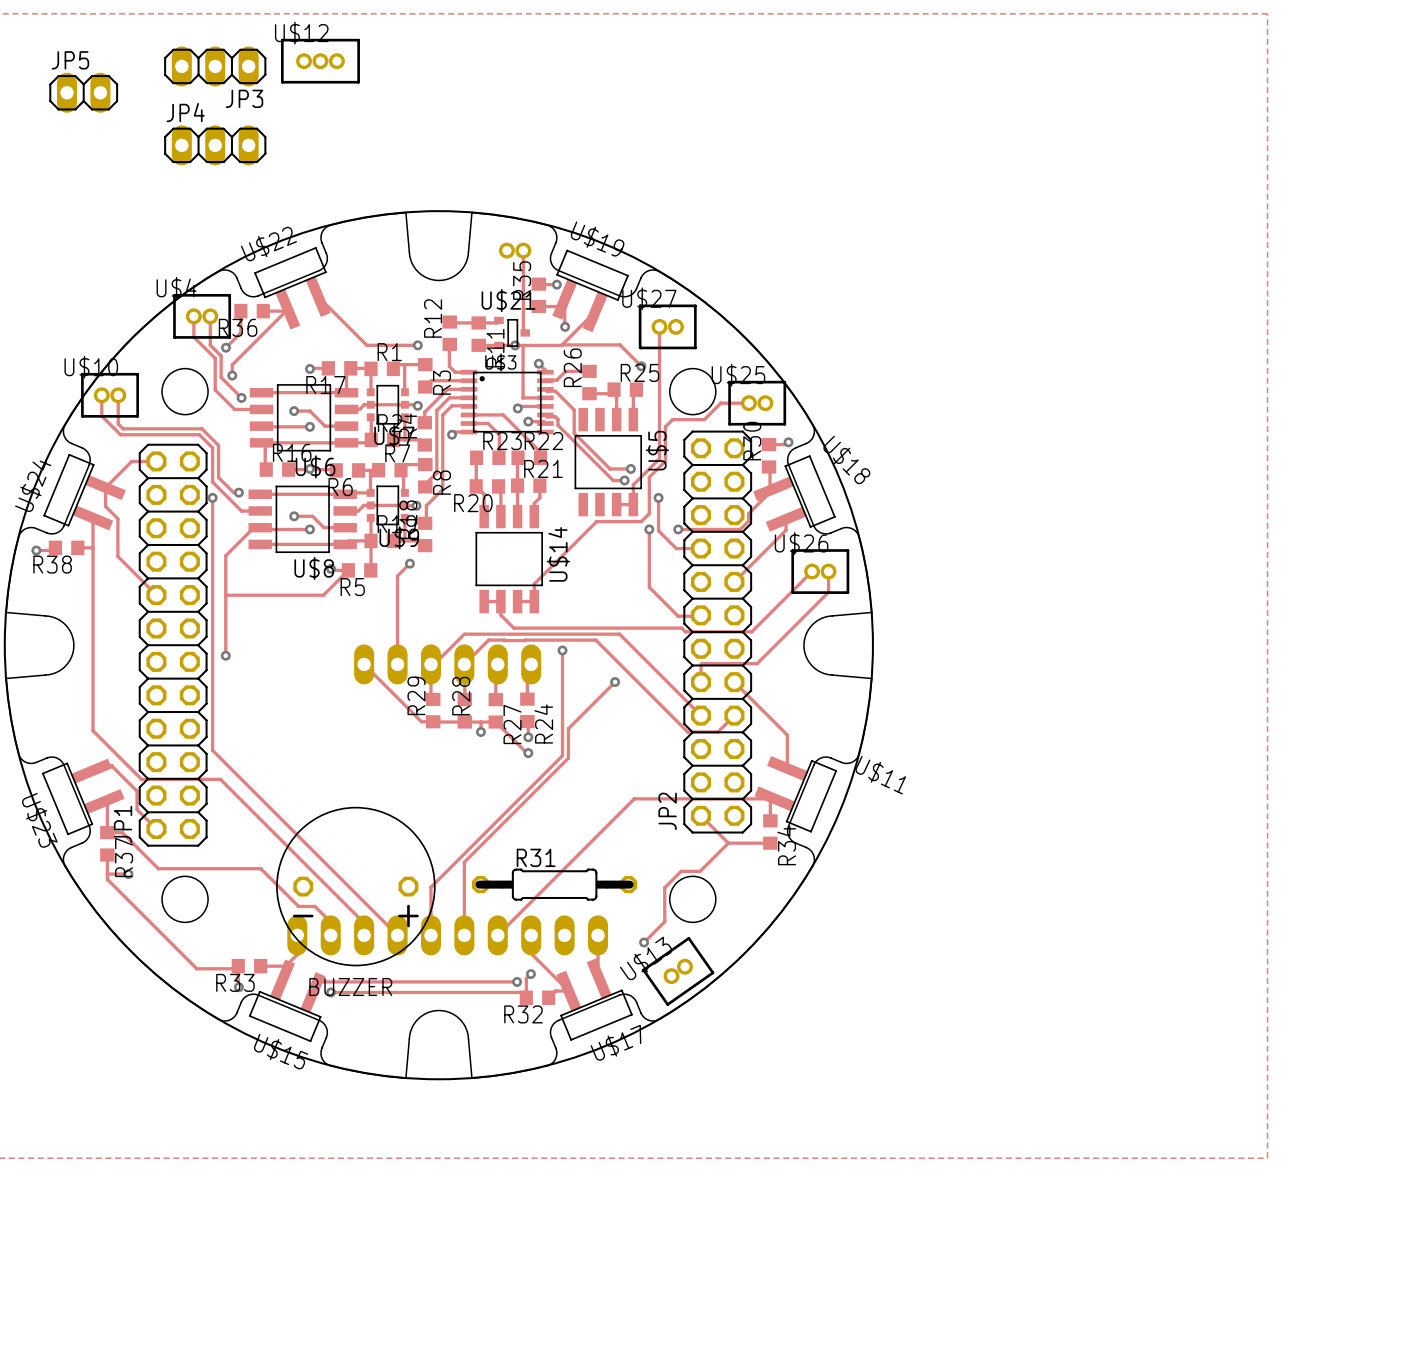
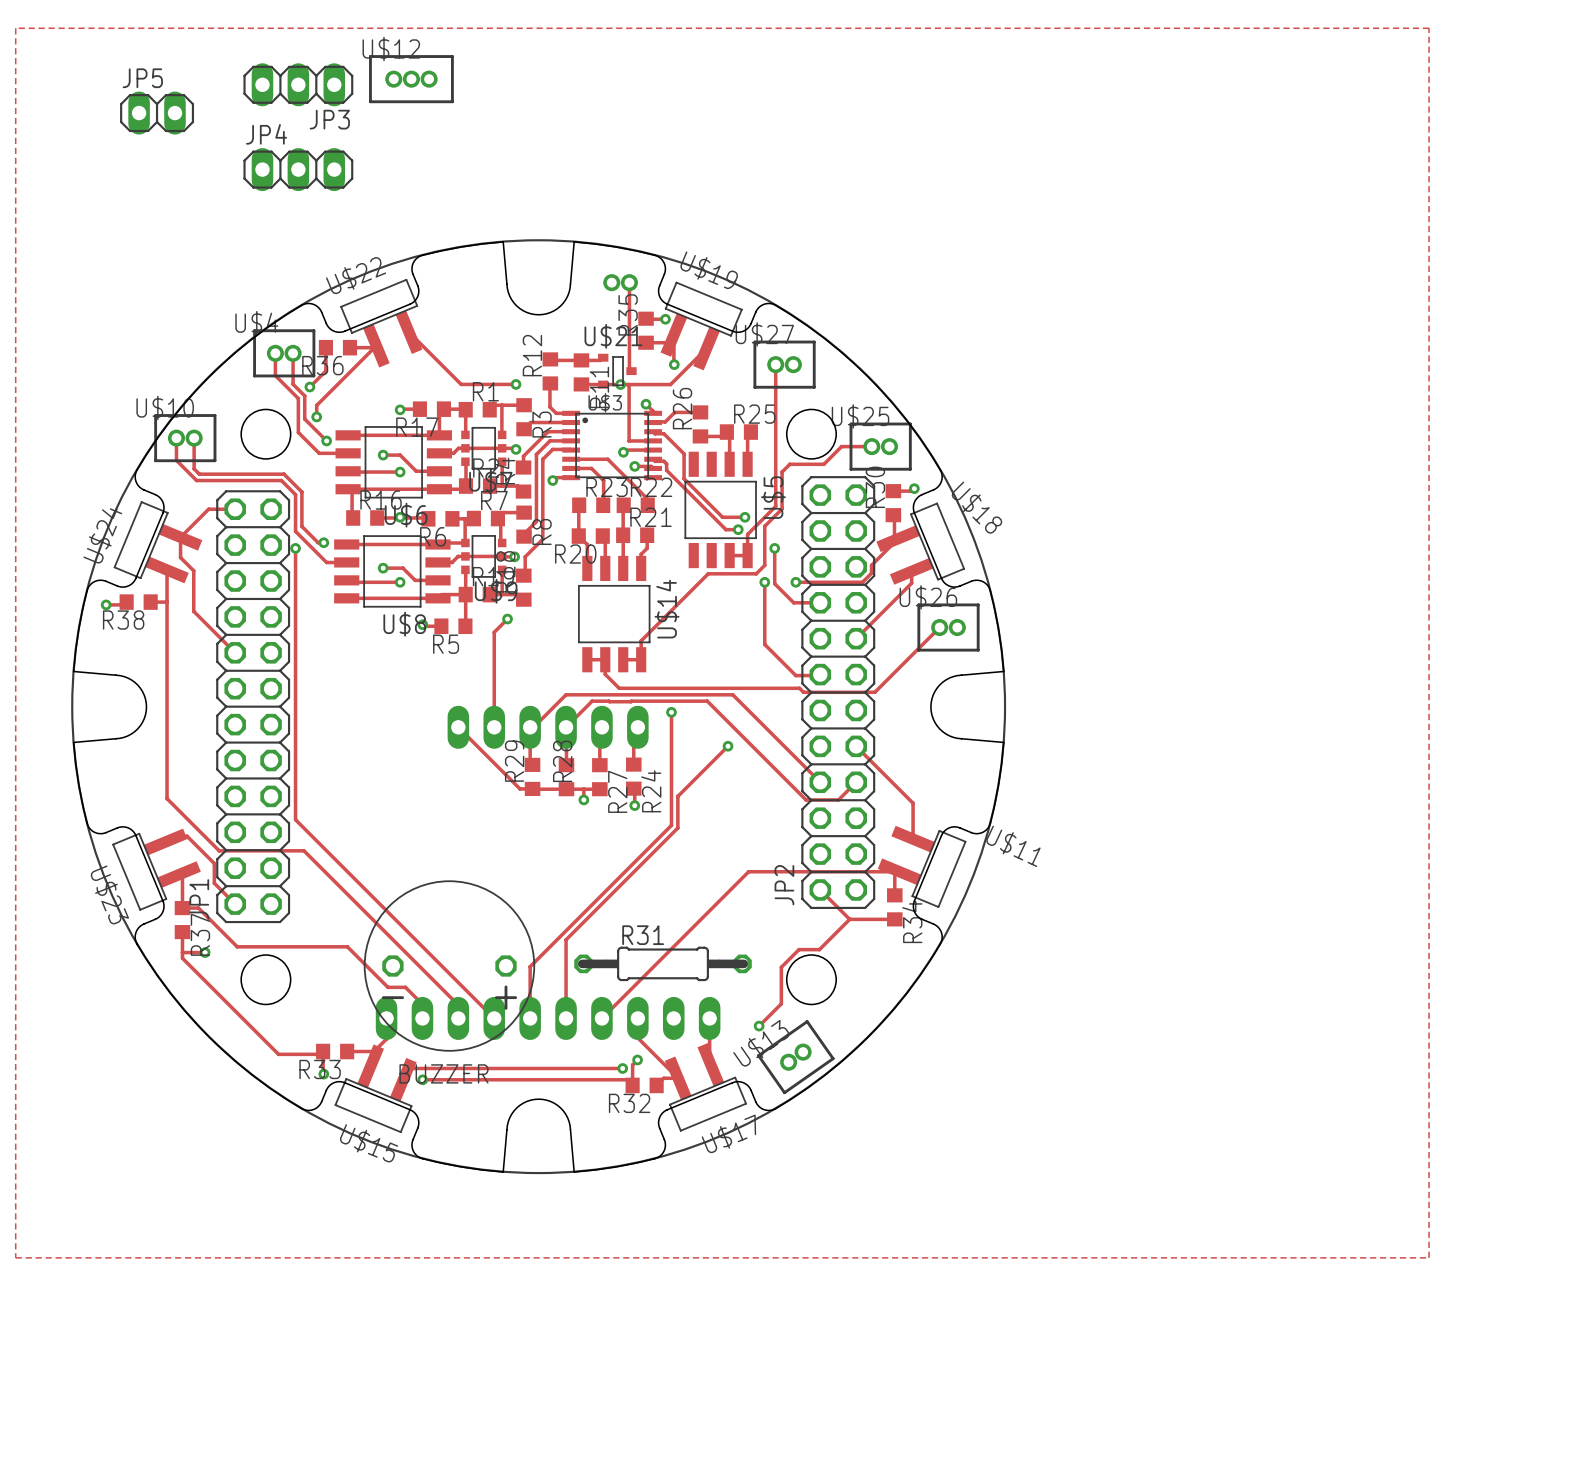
track: (562, 344) (620, 344) (641, 366) -> none
via: (641, 366) -> none
track: (260, 527) (253, 527) (225, 555) (225, 655) -> none
track: (348, 570) (323, 595) (225, 595) -> none
track: (828, 571) (828, 592) (757, 663) (701, 663) (701, 682) -> none
via: (225, 655) -> none
track: (495, 722) (528, 753) -> none
via: (528, 753) -> none

